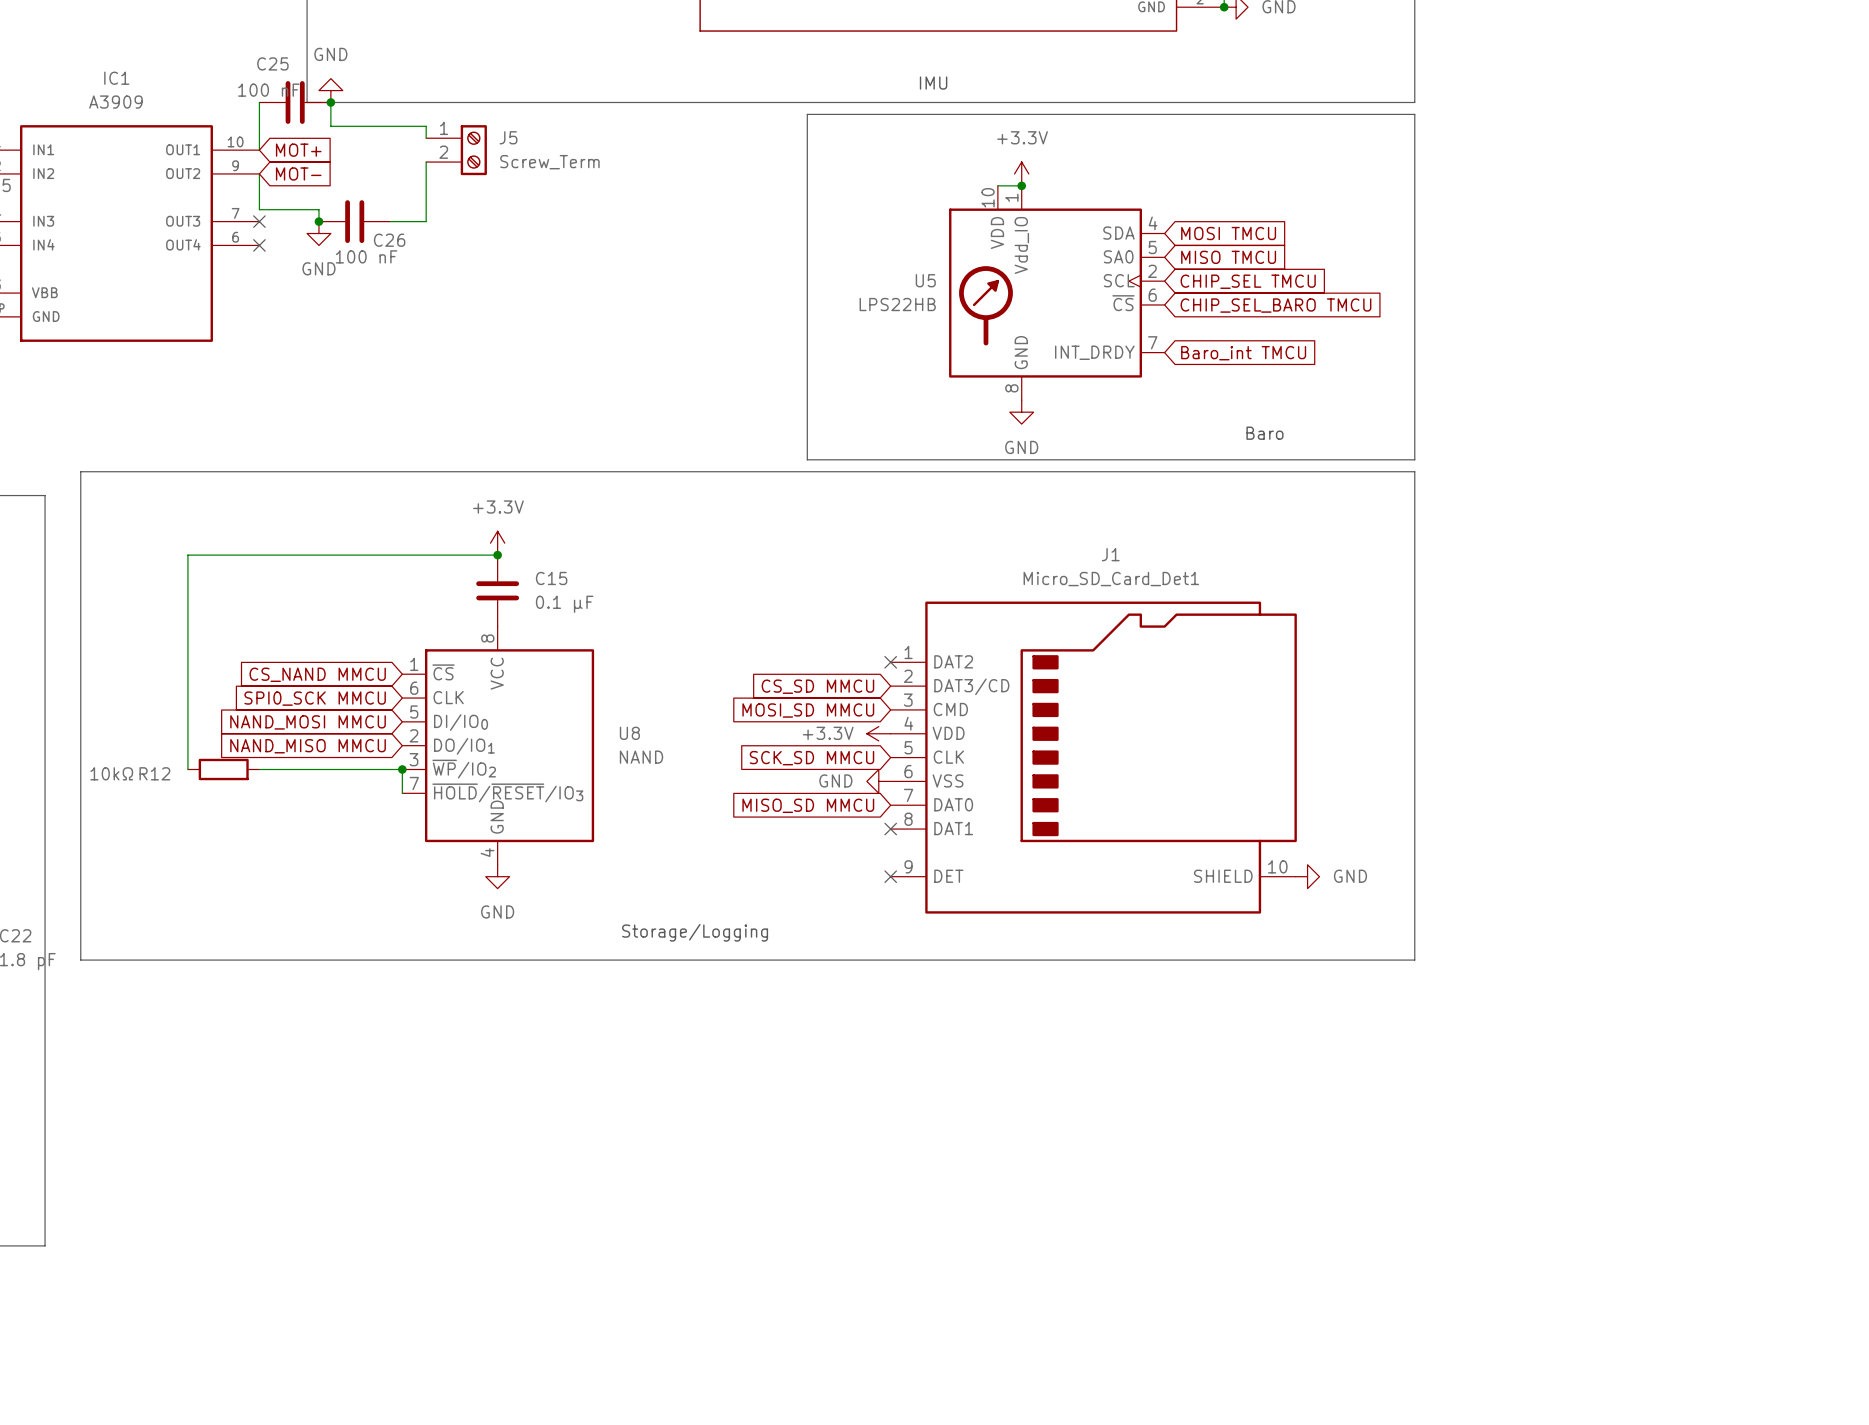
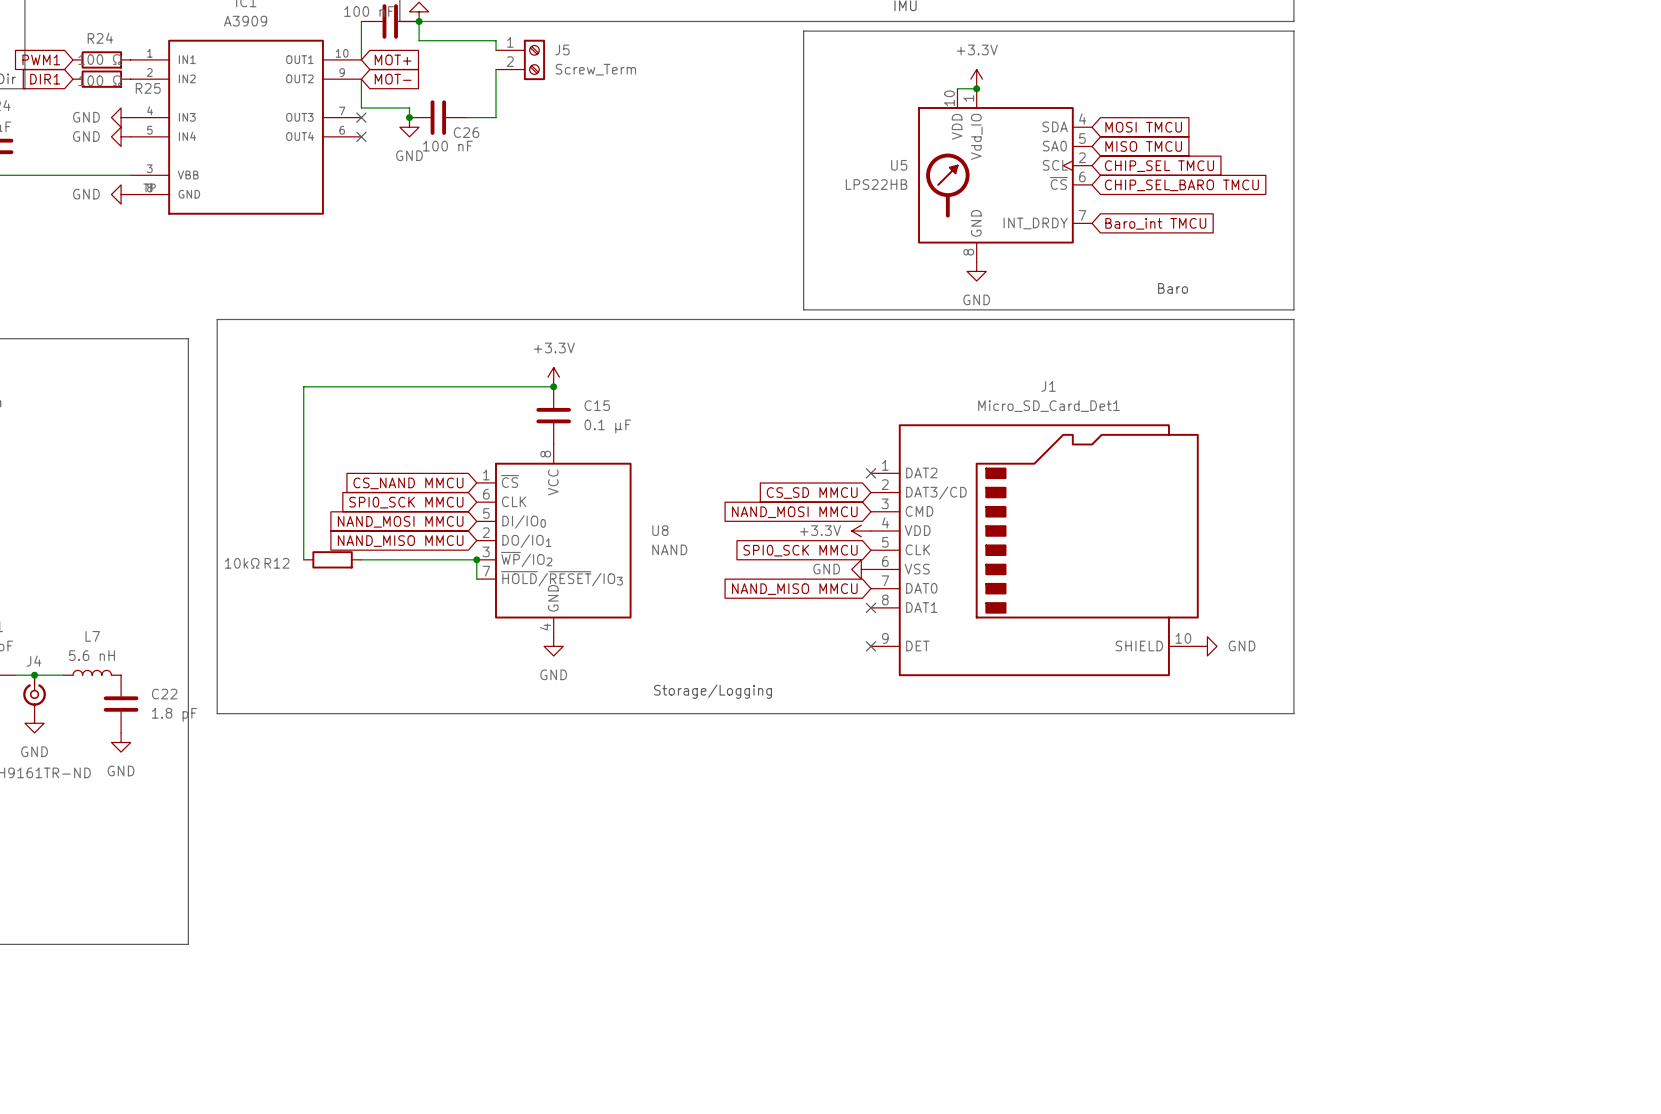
global label: MOSI_SD MMCU (808, 710) -> NAND_MOSI MMCU (794, 512)
global label: SCK_SD MMCU (811, 758) -> SPI0_SCK MMCU (800, 550)
global label: MISO_SD MMCU (808, 805) -> NAND_MISO MMCU (794, 589)

